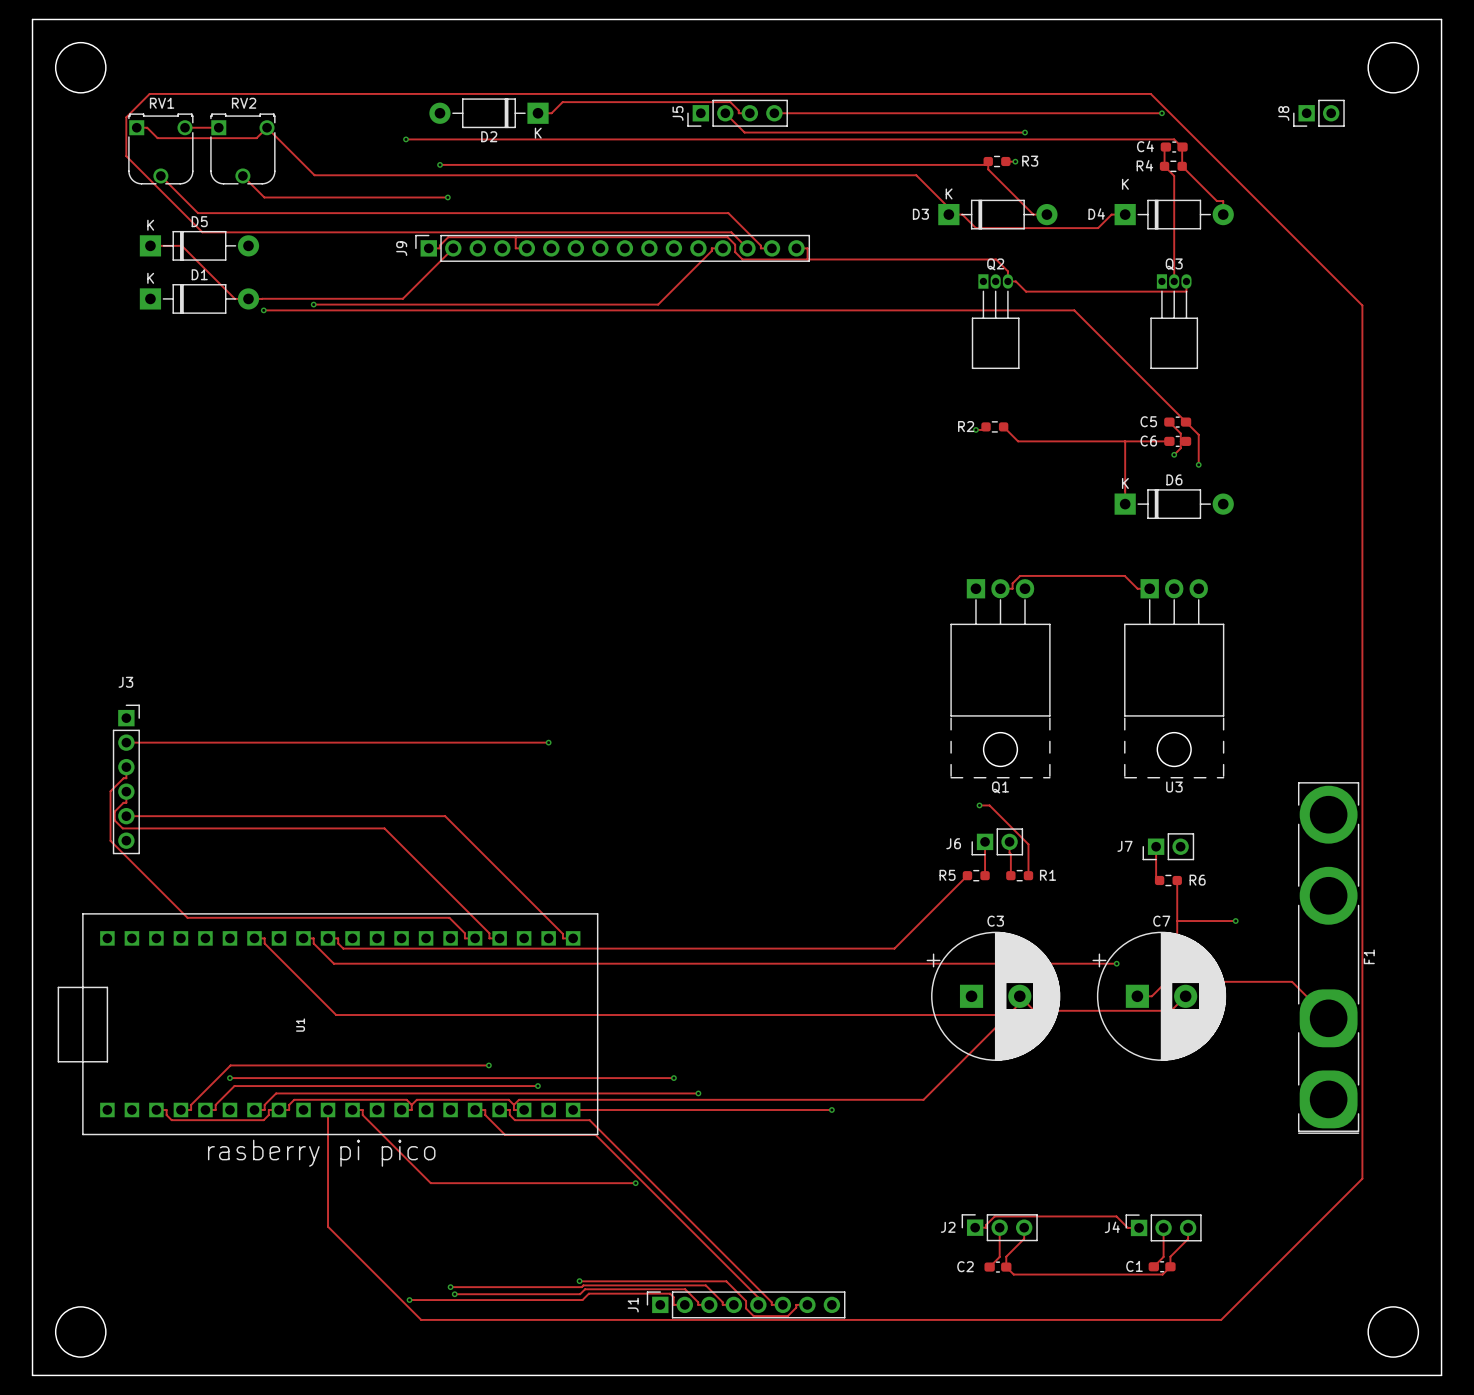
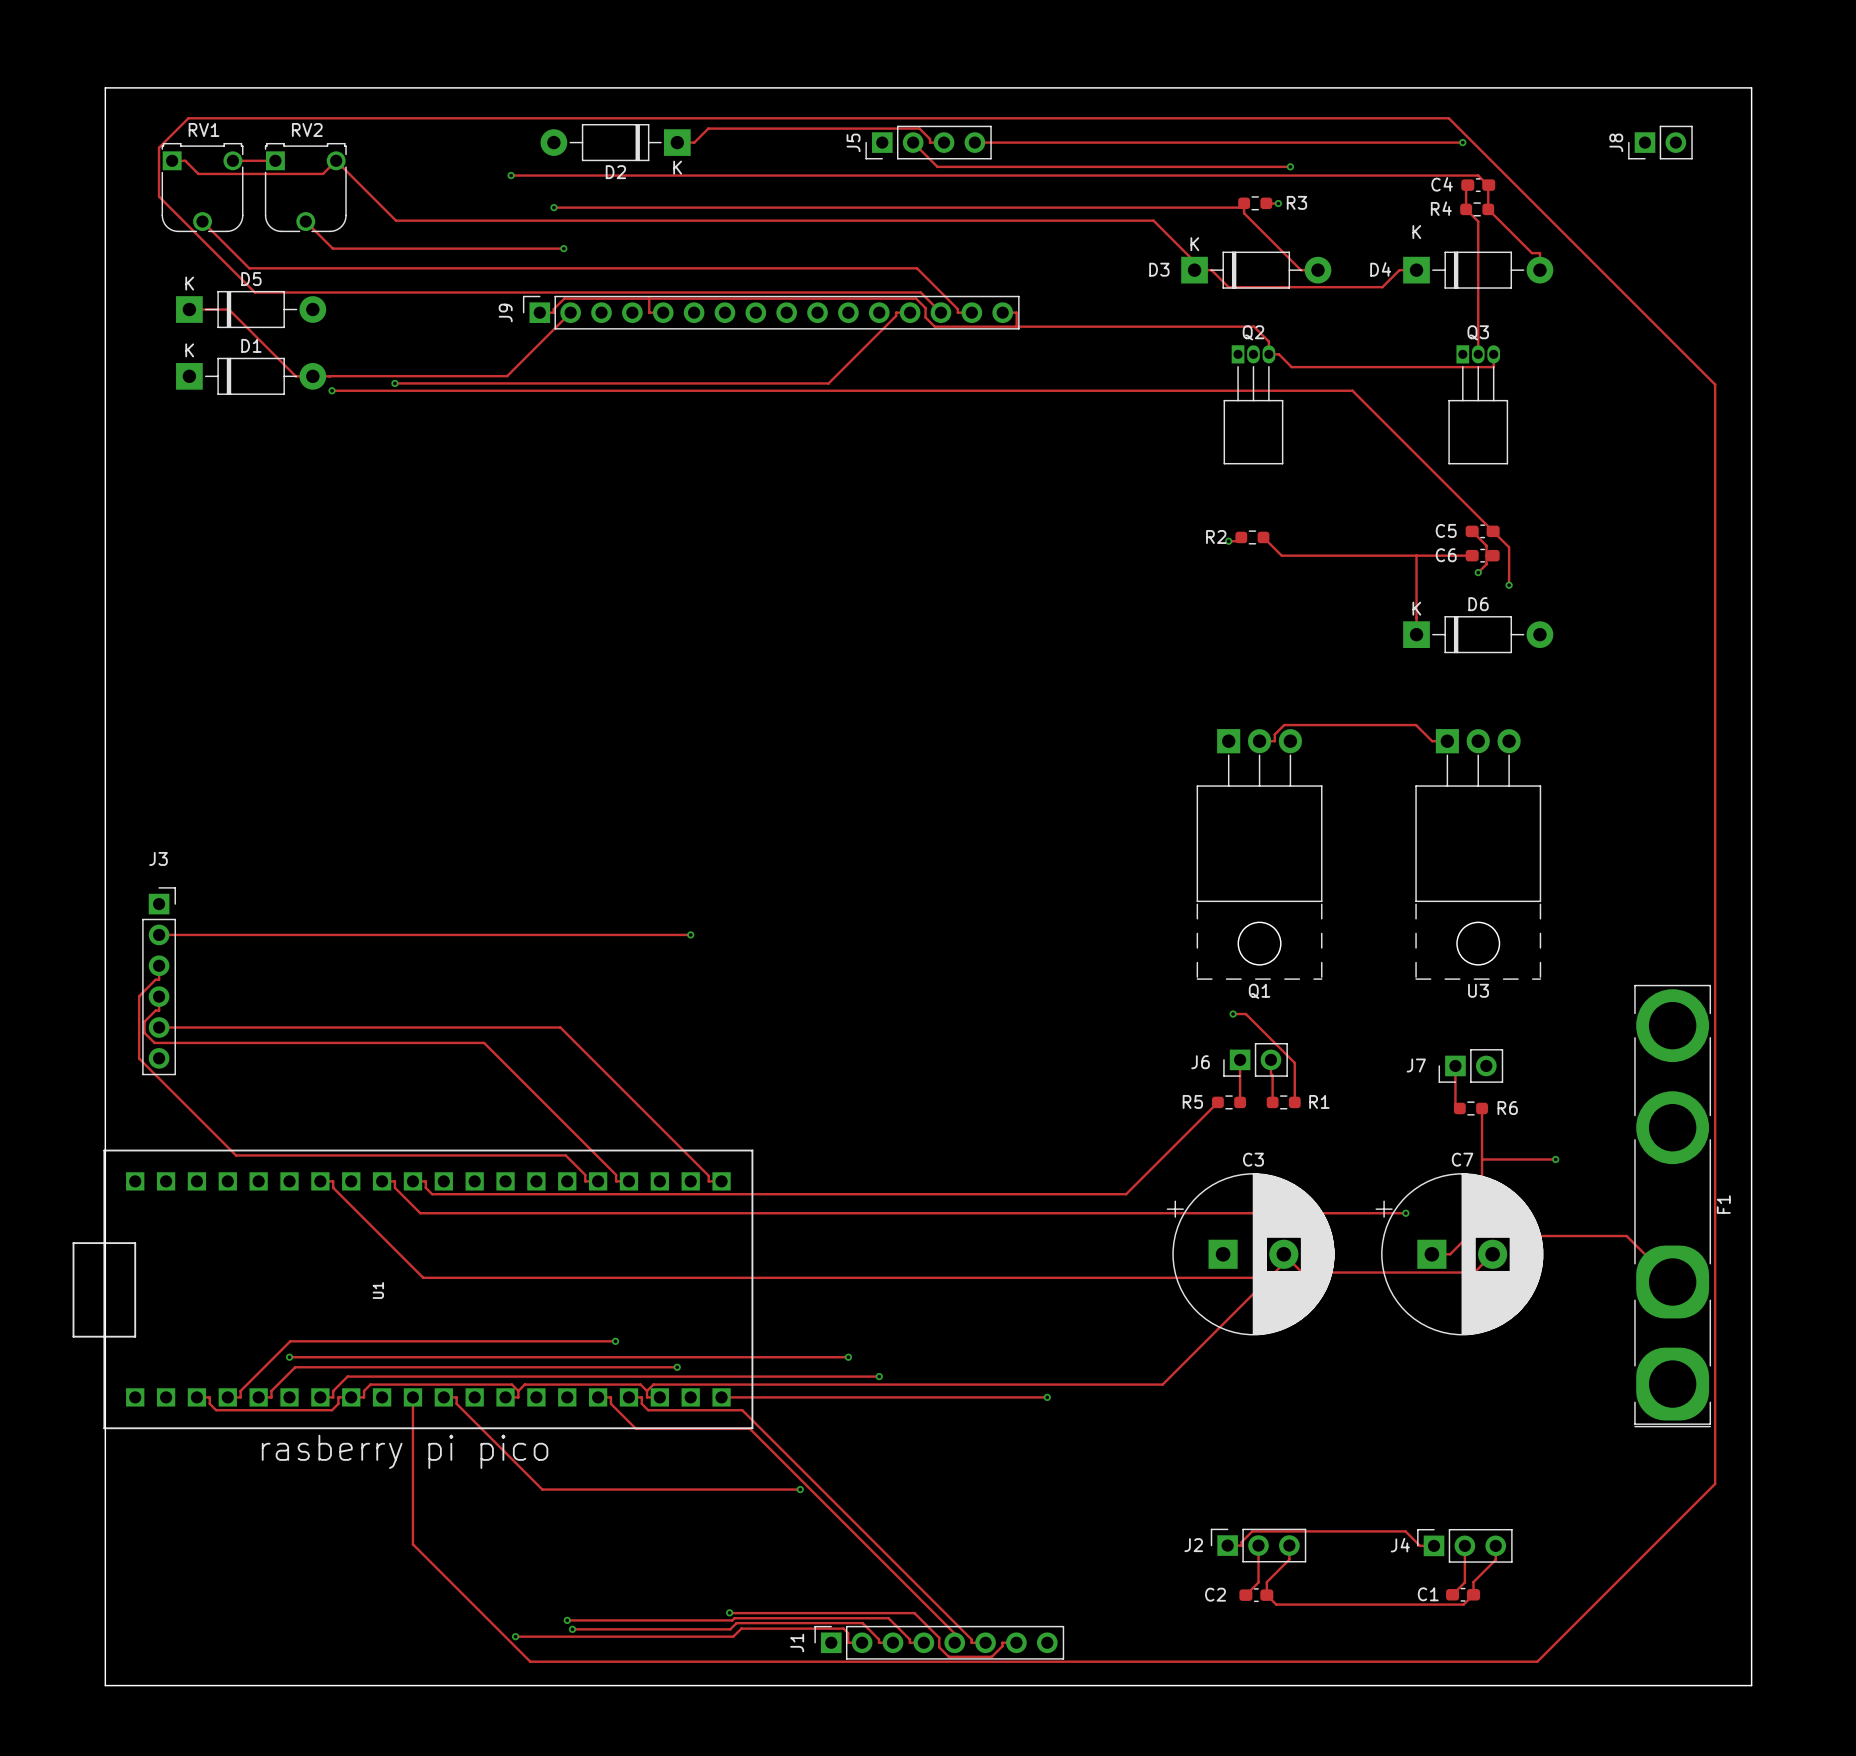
board edge: (32, 19) (1441, 19) (1441, 1375) (32, 1375) (32, 19) -> (105, 87) (105, 1685) (1751, 1685) (1751, 87) (105, 87)
round board edge: [55, 42, 107, 94] -> none
round board edge: [1367, 42, 1419, 94] -> none
round board edge: [55, 1306, 107, 1358] -> none
round board edge: [1367, 1306, 1419, 1358] -> none

